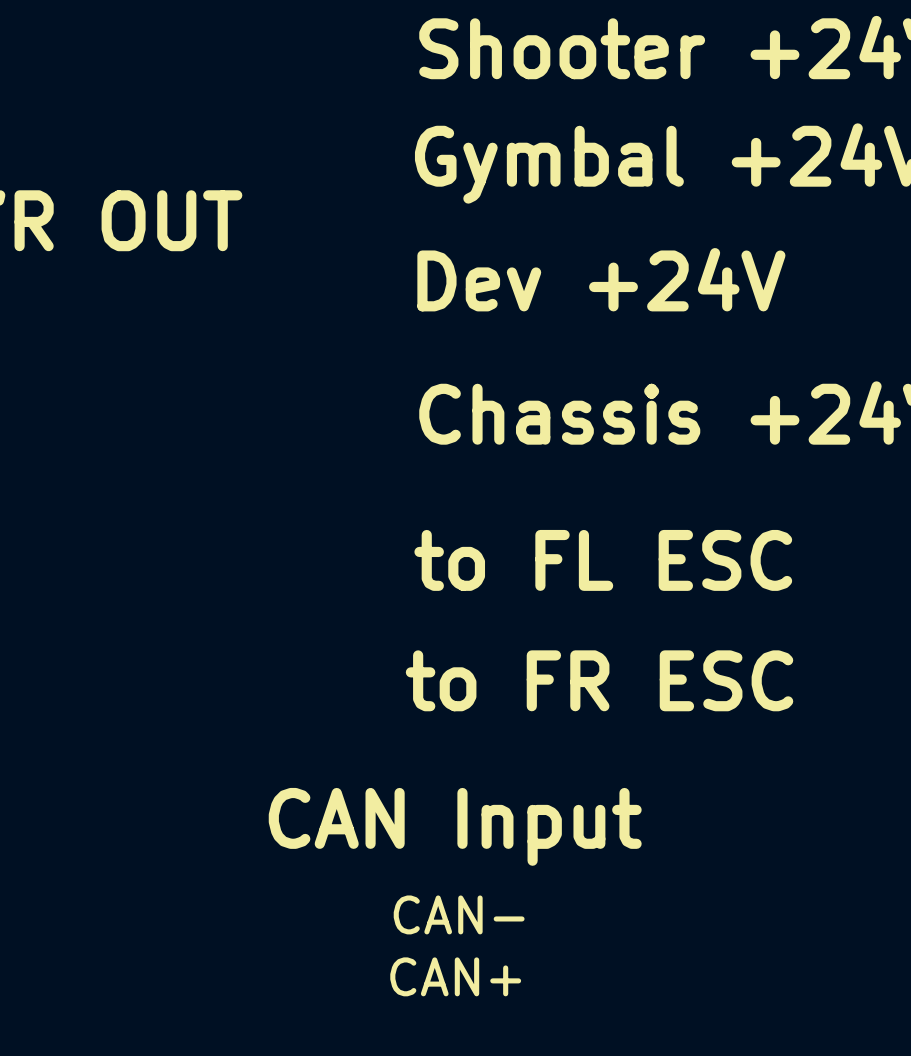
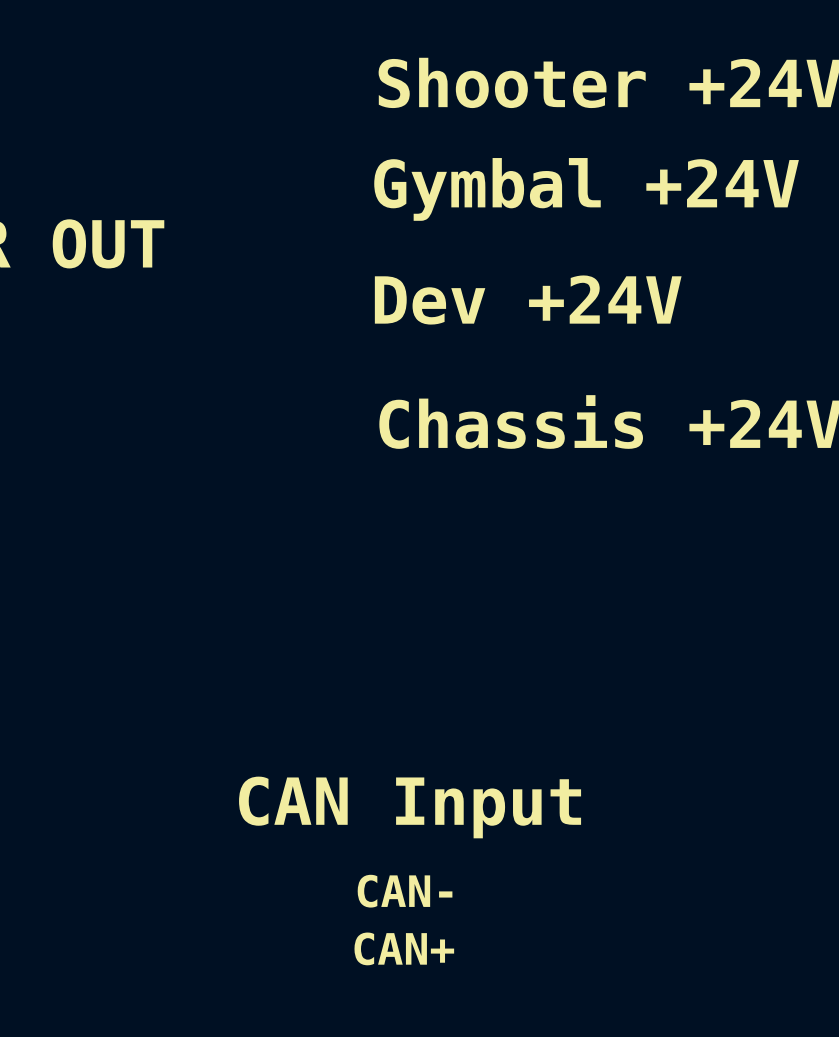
text: to FL ESC (603, 560) -> none
text: to FR ESC (599, 680) -> none

